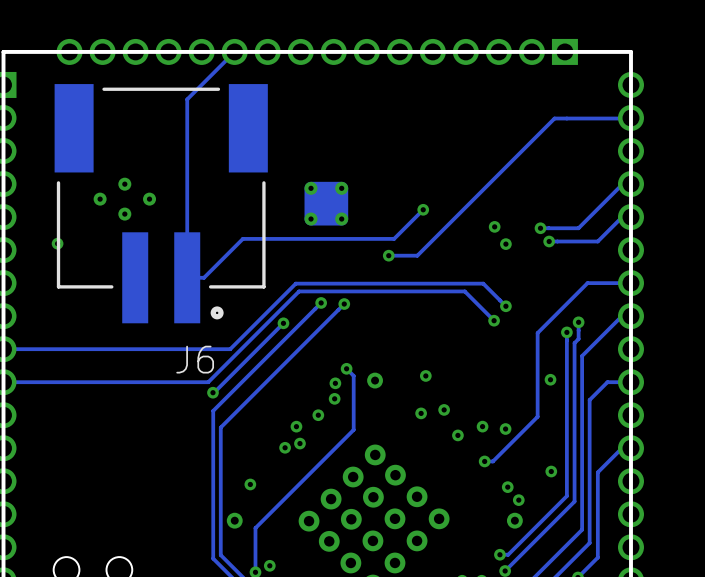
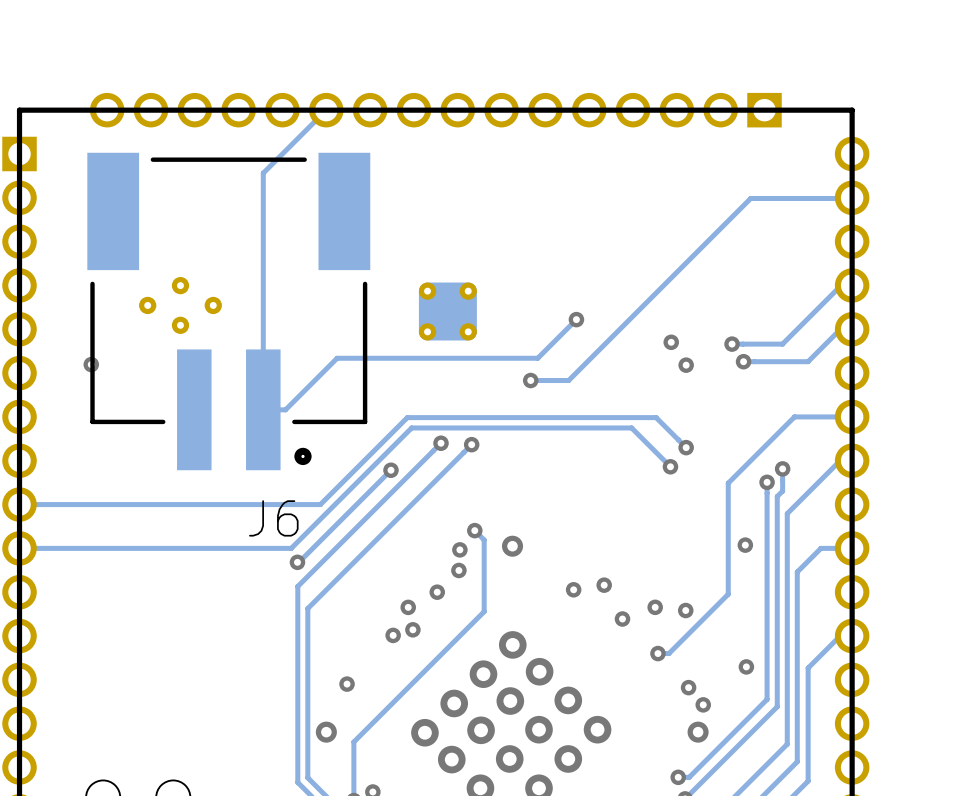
via: (425, 375) -> none

